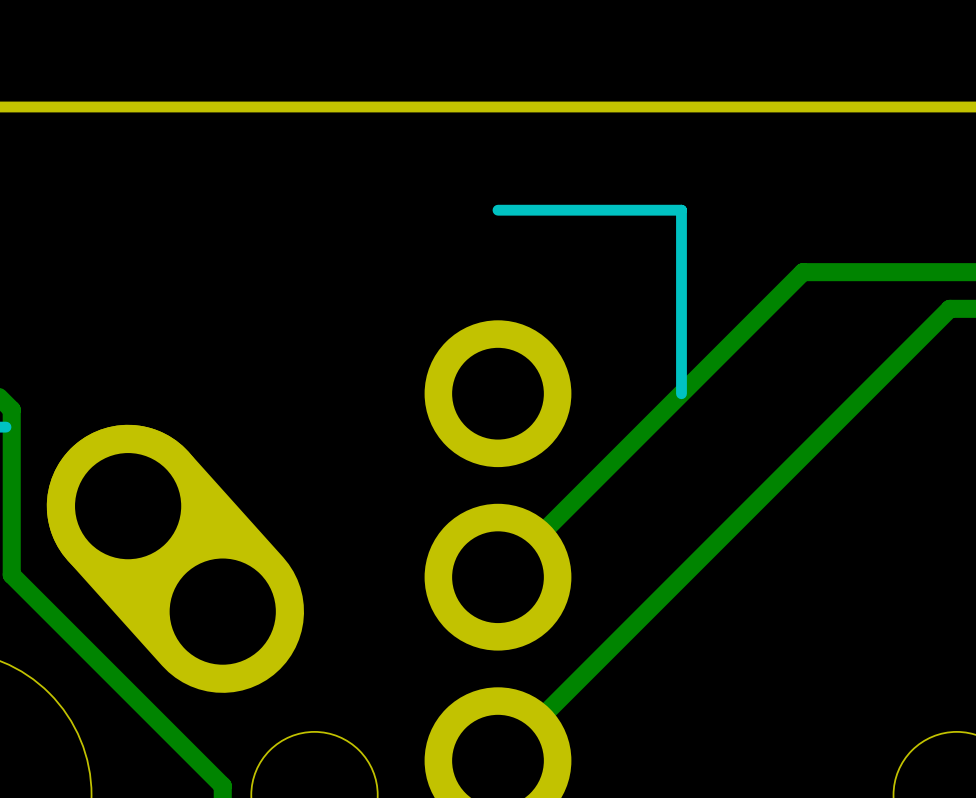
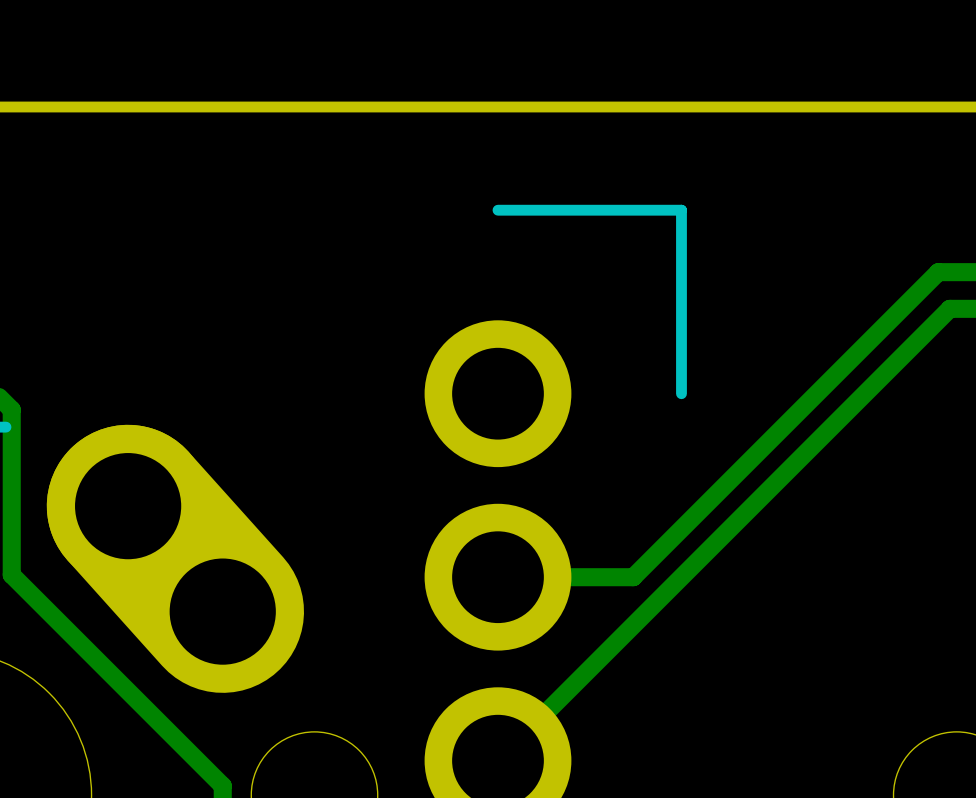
track: (938, 272) (803, 272) (497, 577) -> (938, 272) (633, 577) (497, 577)

